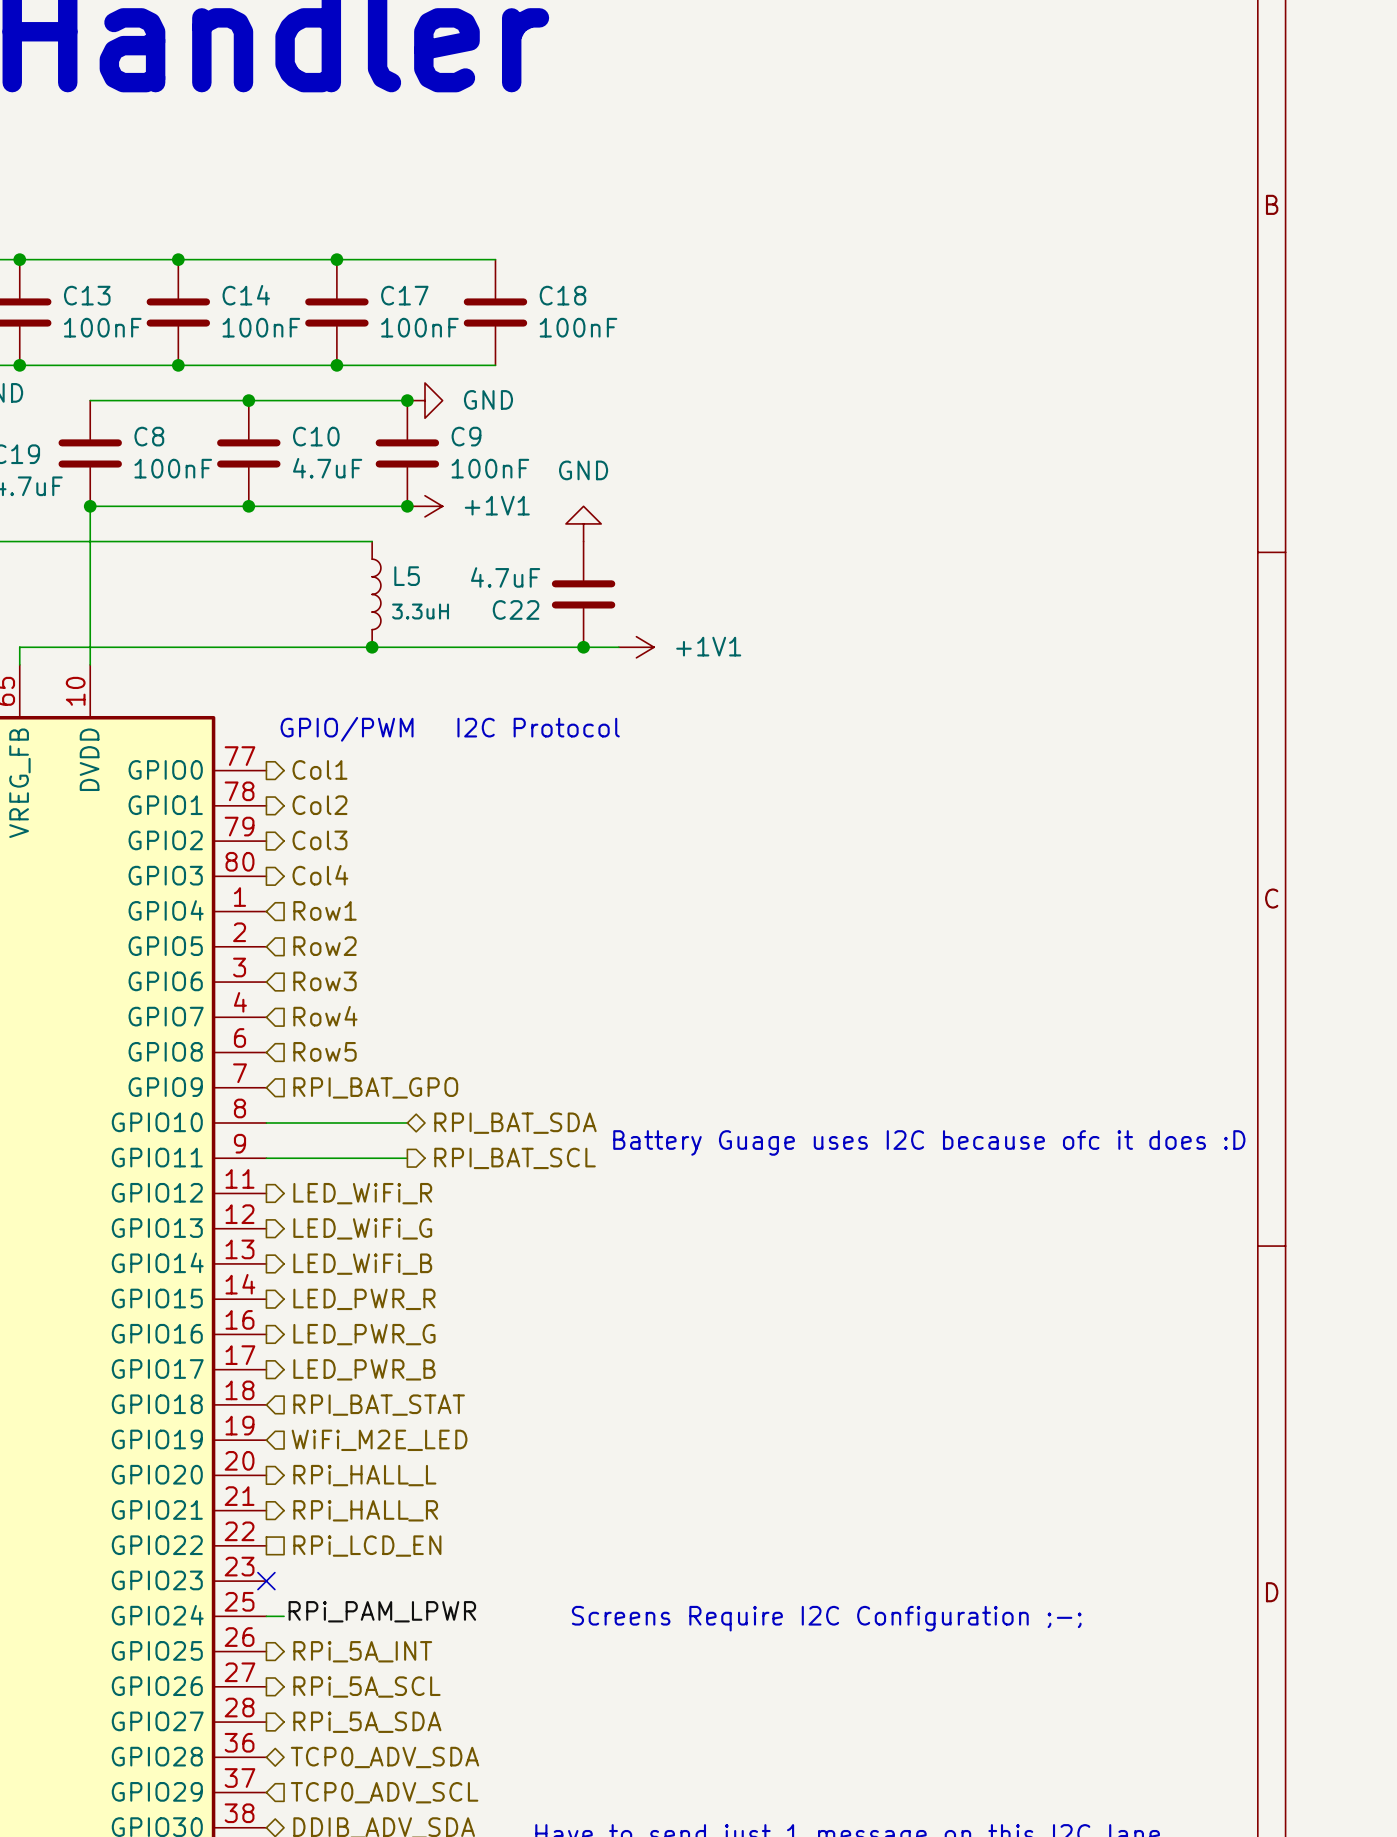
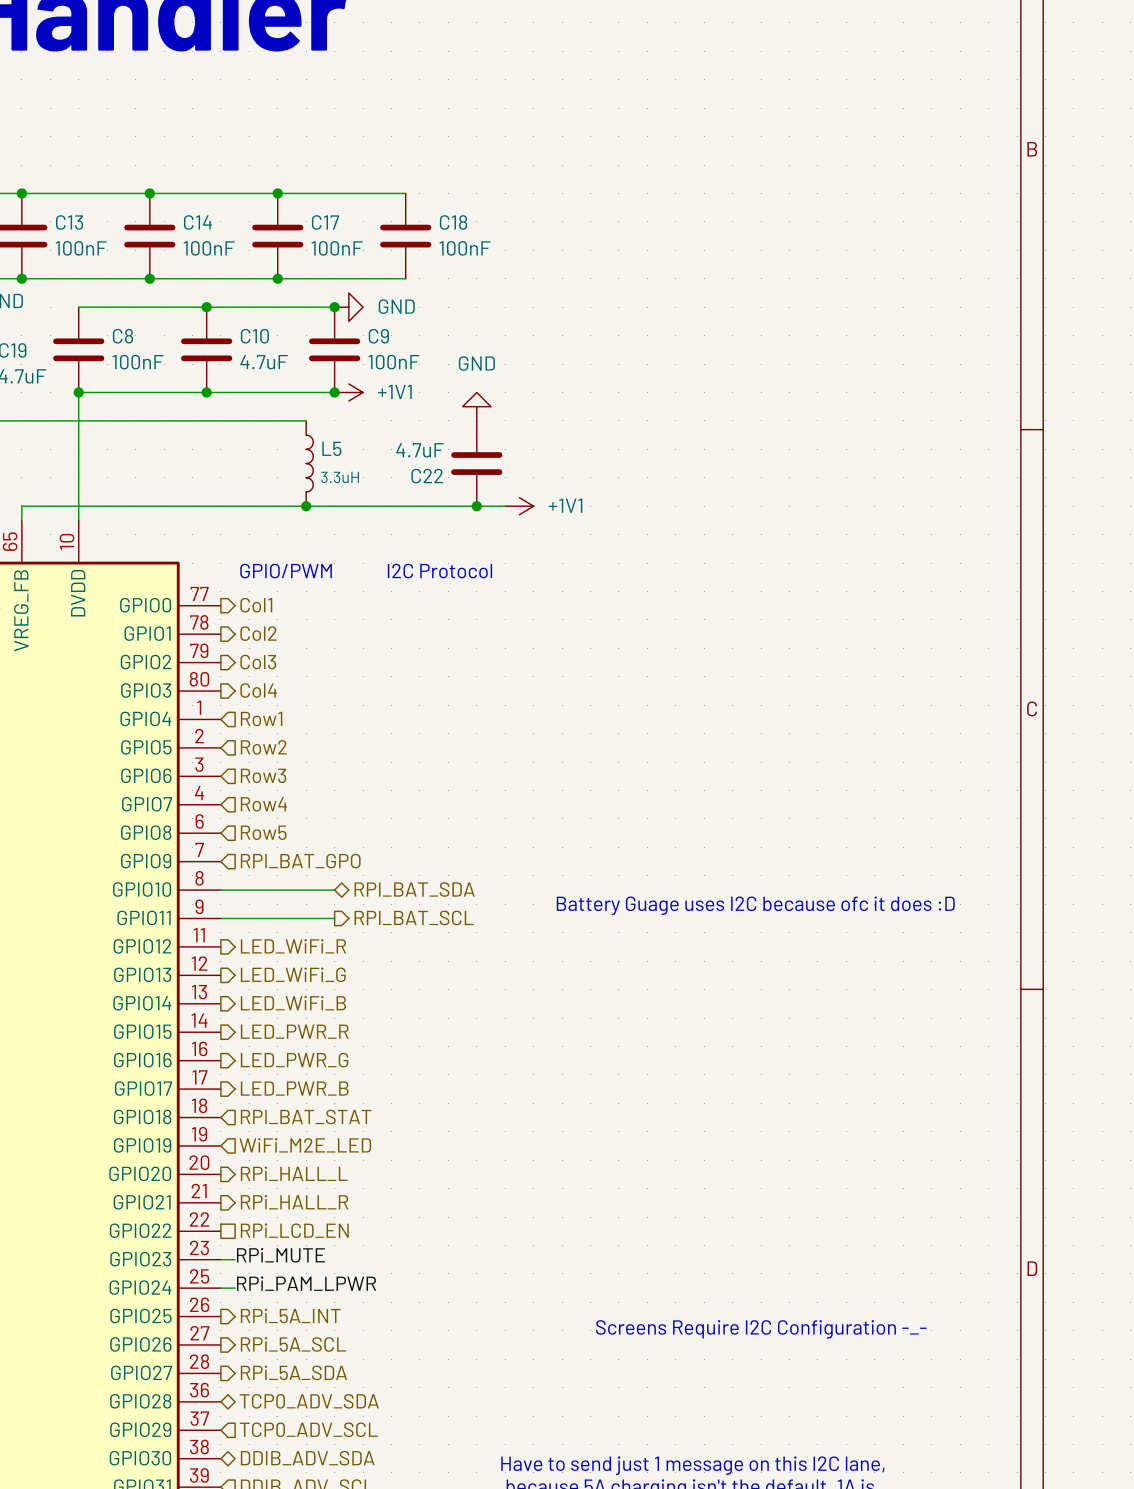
label: none -> RPi_MUTE (280, 1255)
wire: none -> (220, 1259) (235, 1259)
no-connect mark: (266, 1581) -> none
text: Screens Require I2C Configuration ;-; (826, 1618) -> none
text: none -> Screens Require I2C Configuration -_- (761, 1329)

